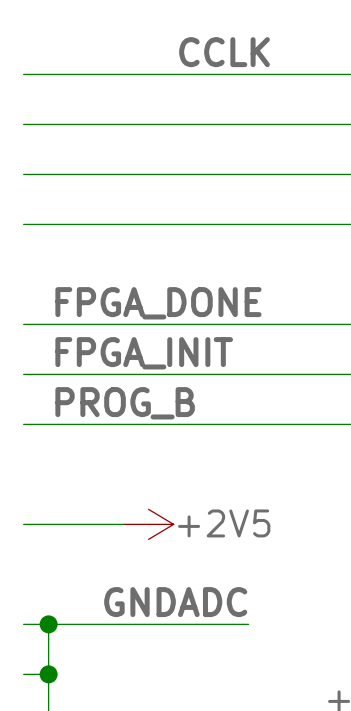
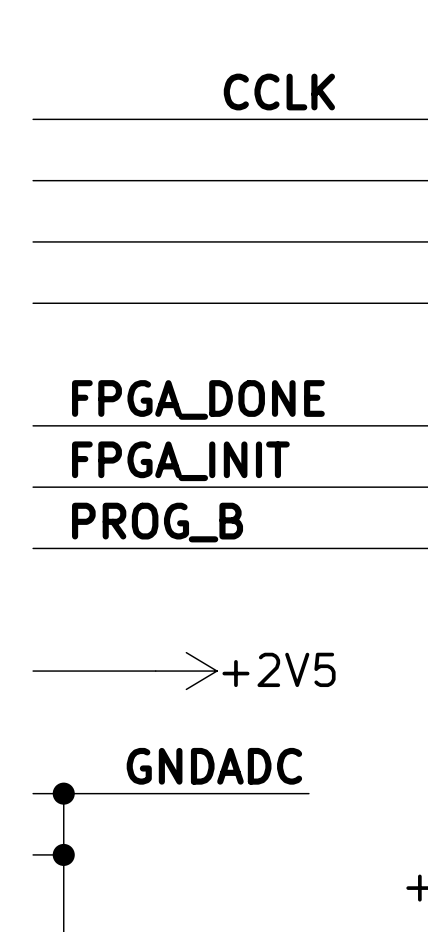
label position: GNDADC (175, 602) -> GNDADC (214, 766)

